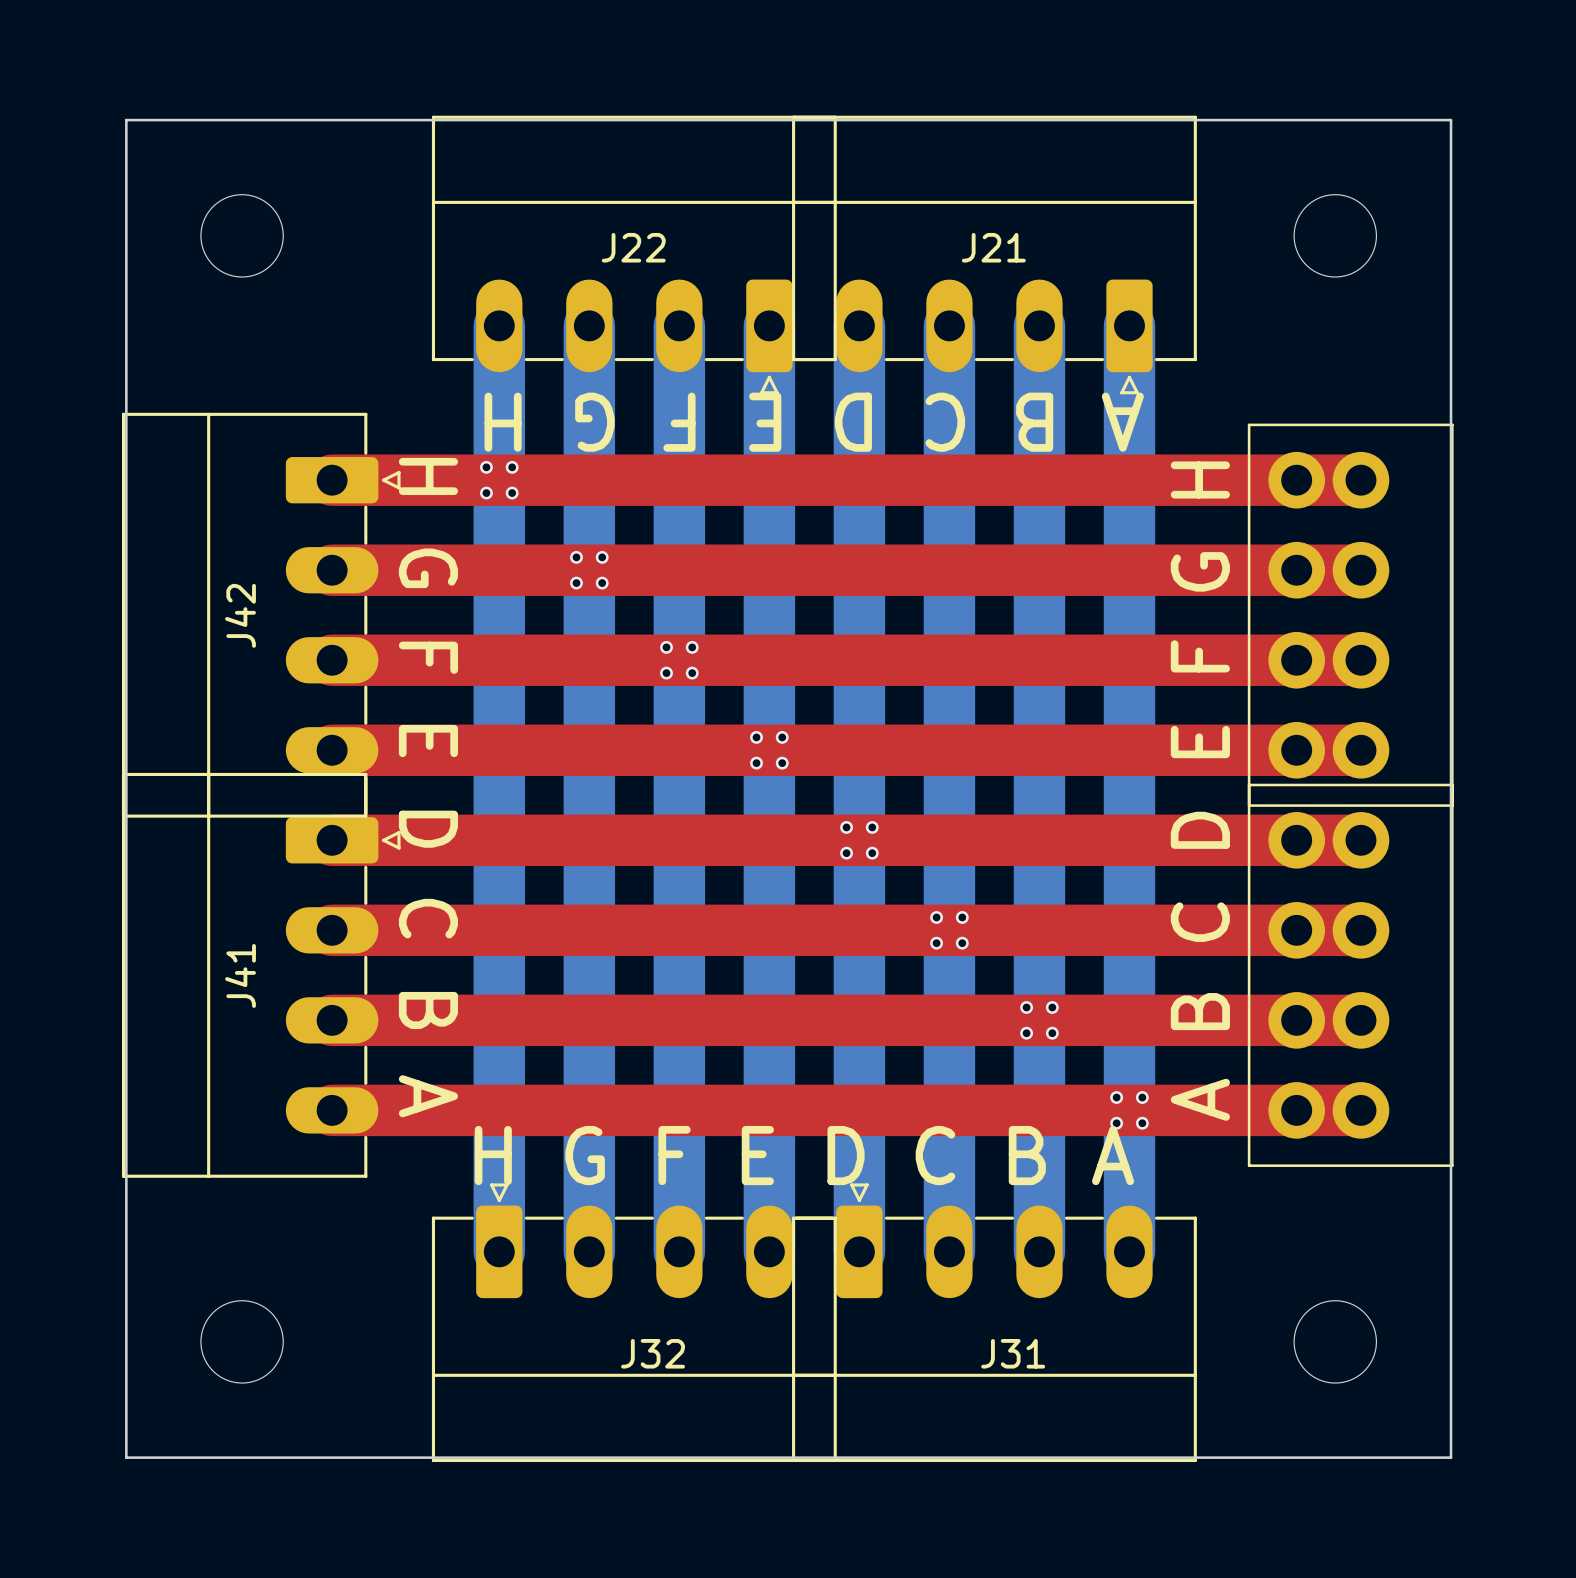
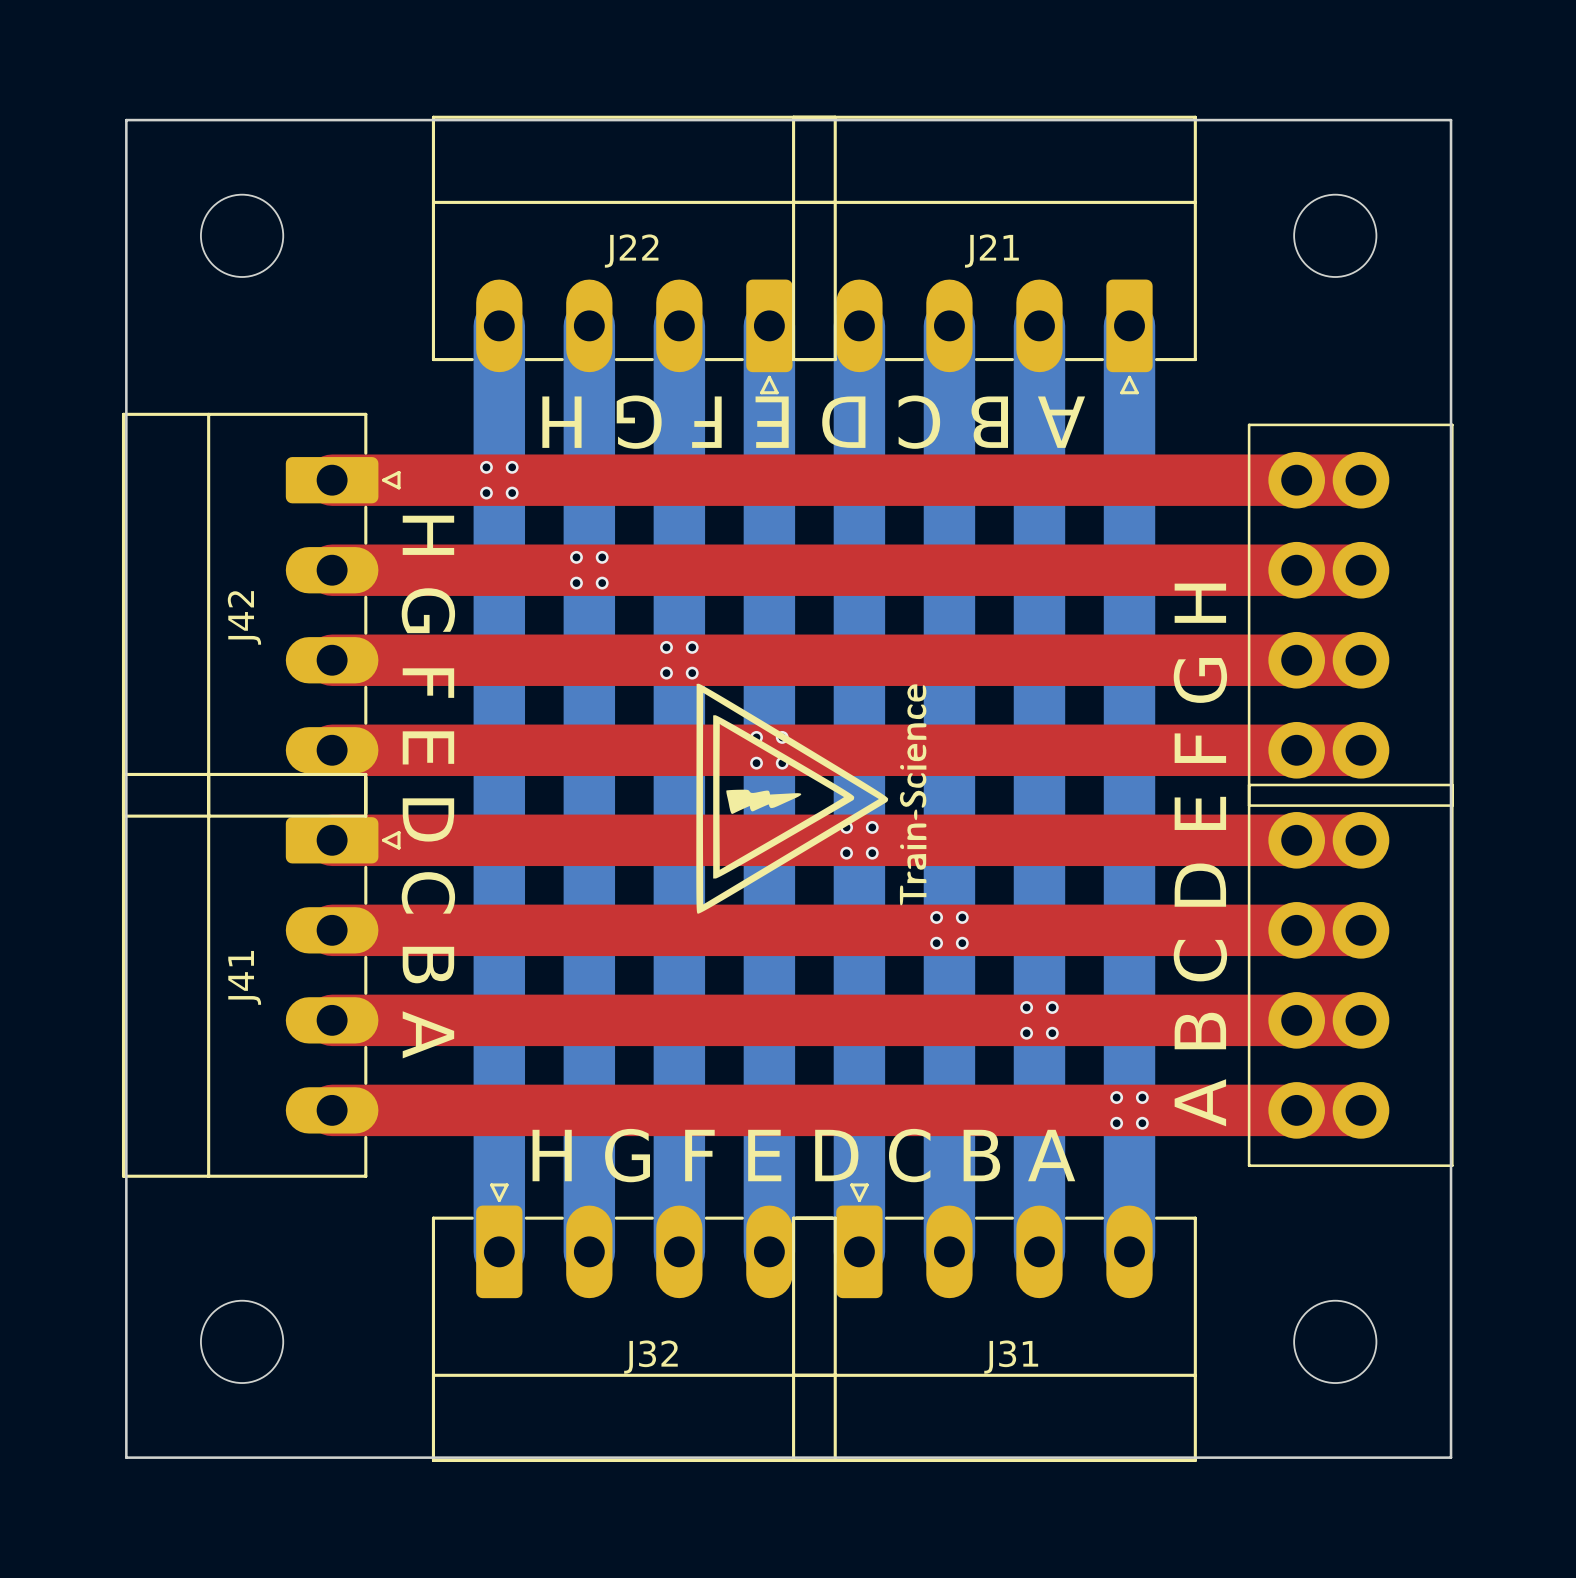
drawing: none -> [696, 683, 927, 914]

